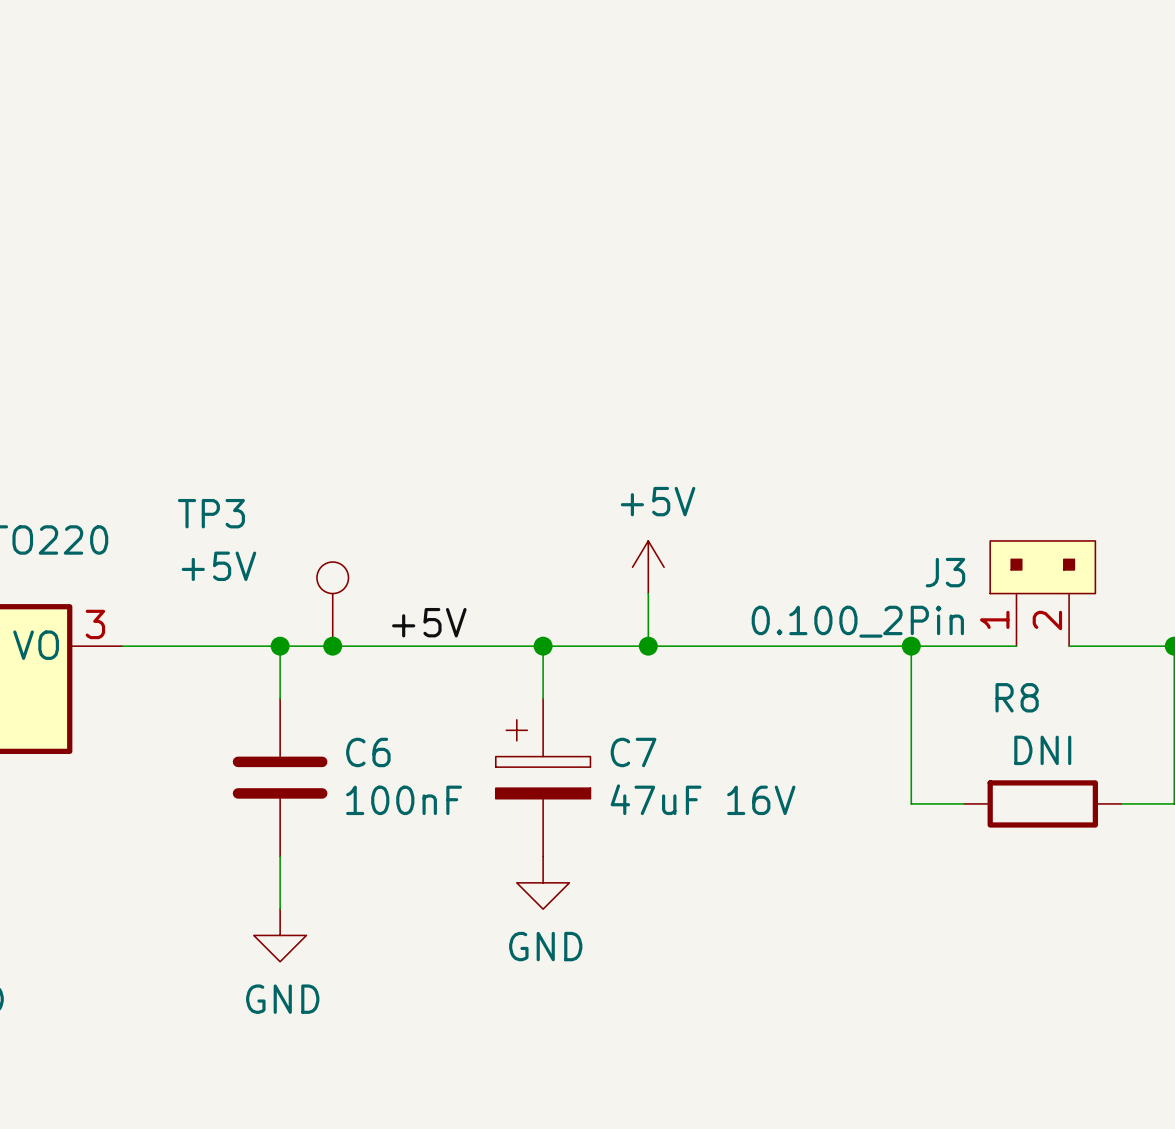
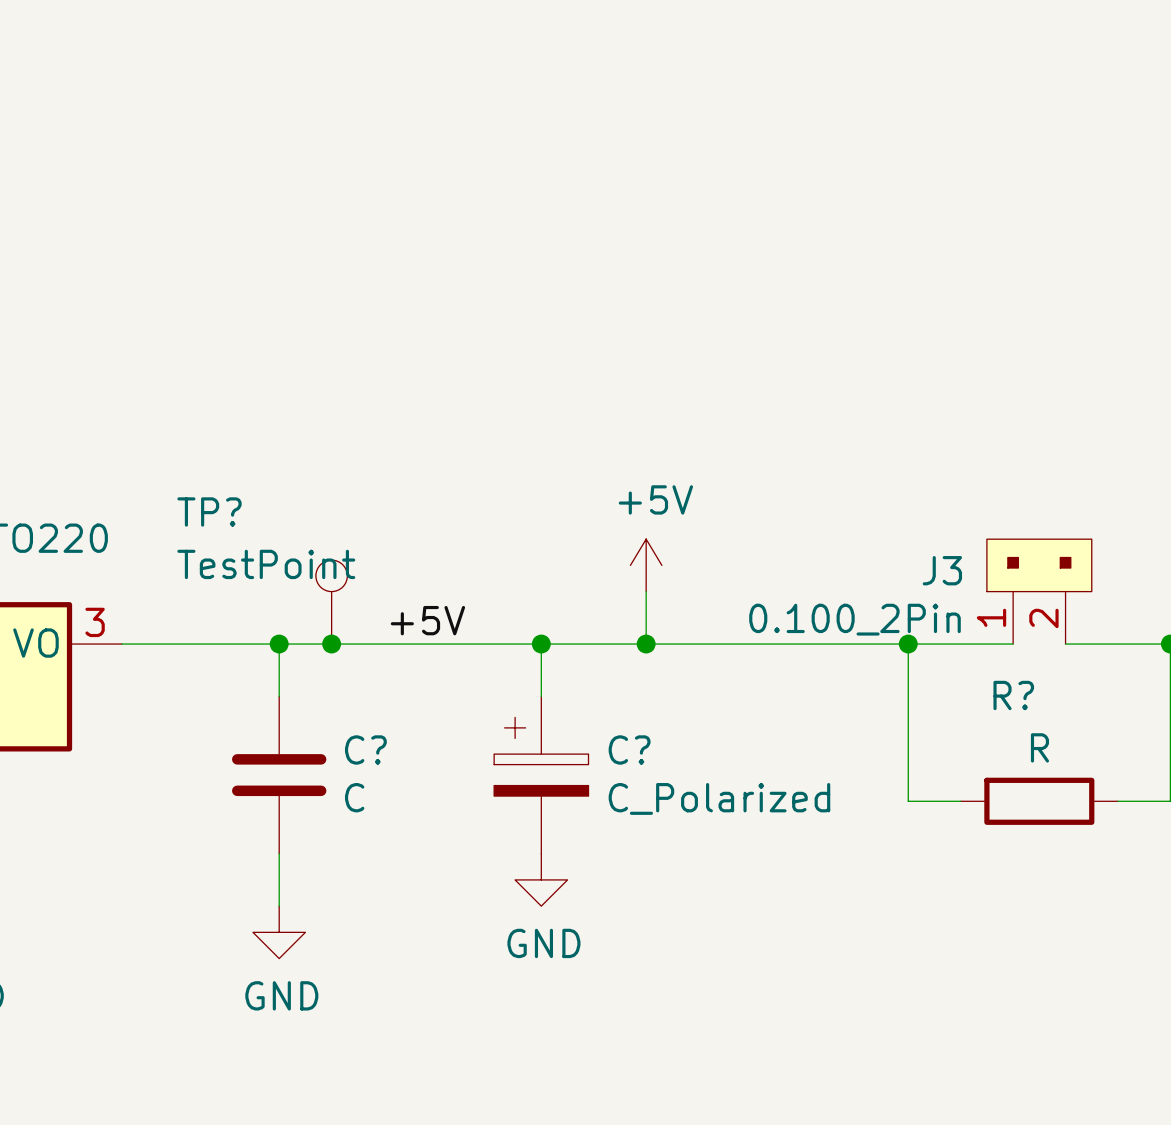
TP3 name: TP3 (211, 513) -> TP? (209, 511)
TP3 value: +5V (218, 566) -> TestPoint (266, 564)
R8 name: R8 (1017, 697) -> R? (1013, 695)
R8 value: DNI (1042, 750) -> R (1039, 747)
C6 name: C6 (368, 752) -> C? (365, 749)
C7 name: C7 (633, 752) -> C? (629, 749)
C7 value: 47uF 16V (703, 799) -> C_Polarized (719, 798)
C6 value: 100nF (404, 800) -> C (354, 797)

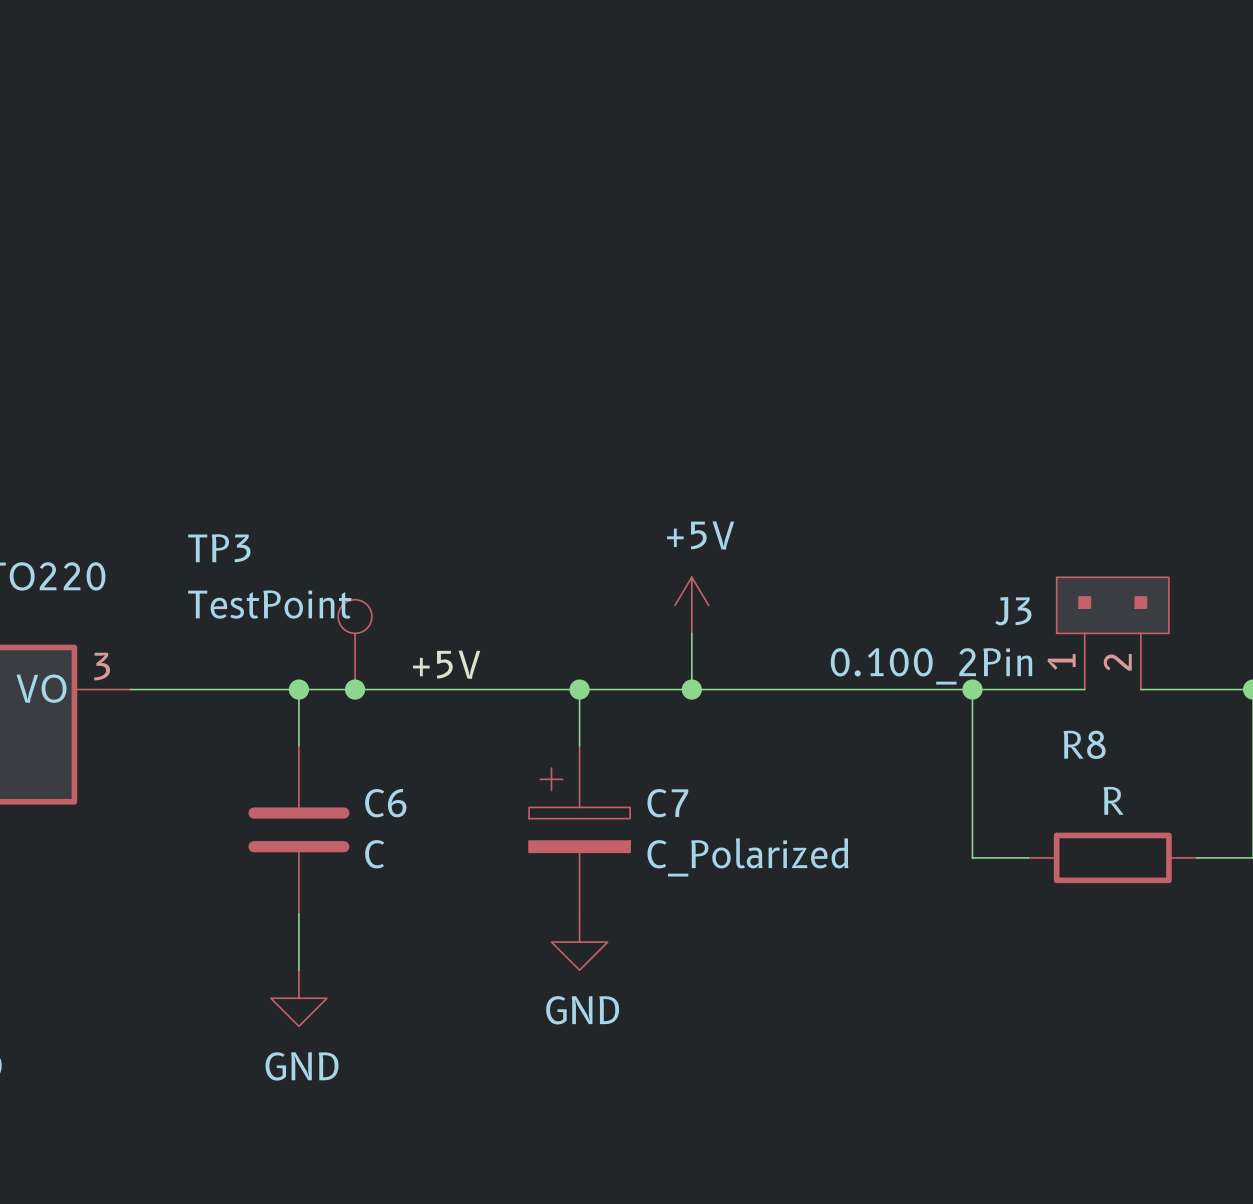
TP? name: TP? (209, 511) -> TP3 (219, 548)
R? name: R? (1013, 695) -> R8 (1084, 744)
C? name: C? (365, 749) -> C6 (385, 803)
C? name: C? (629, 749) -> C7 (667, 803)

